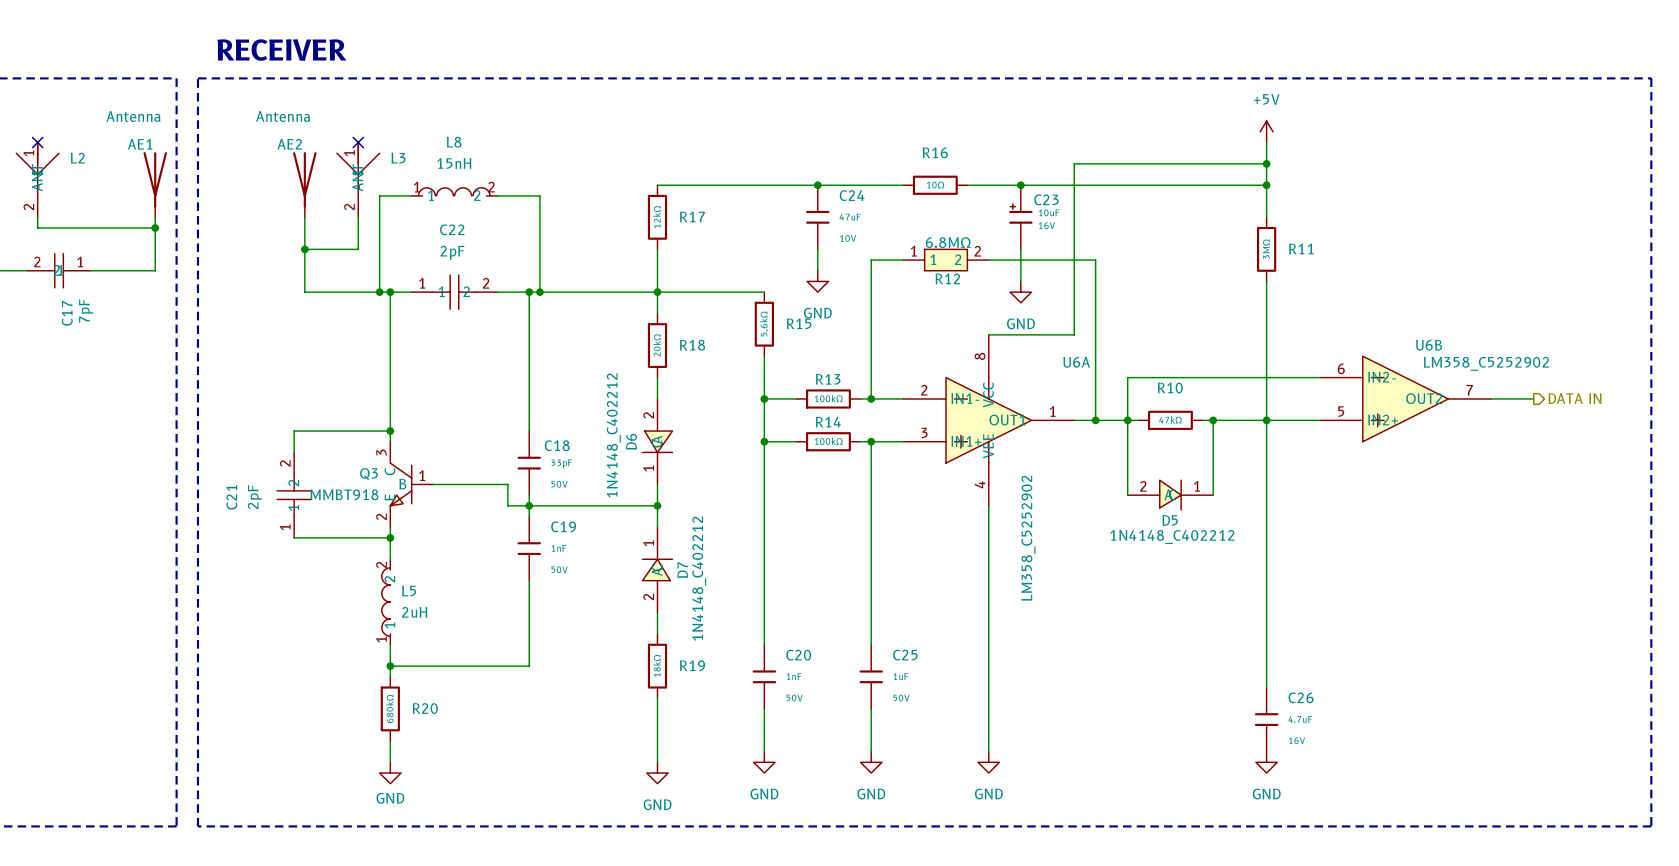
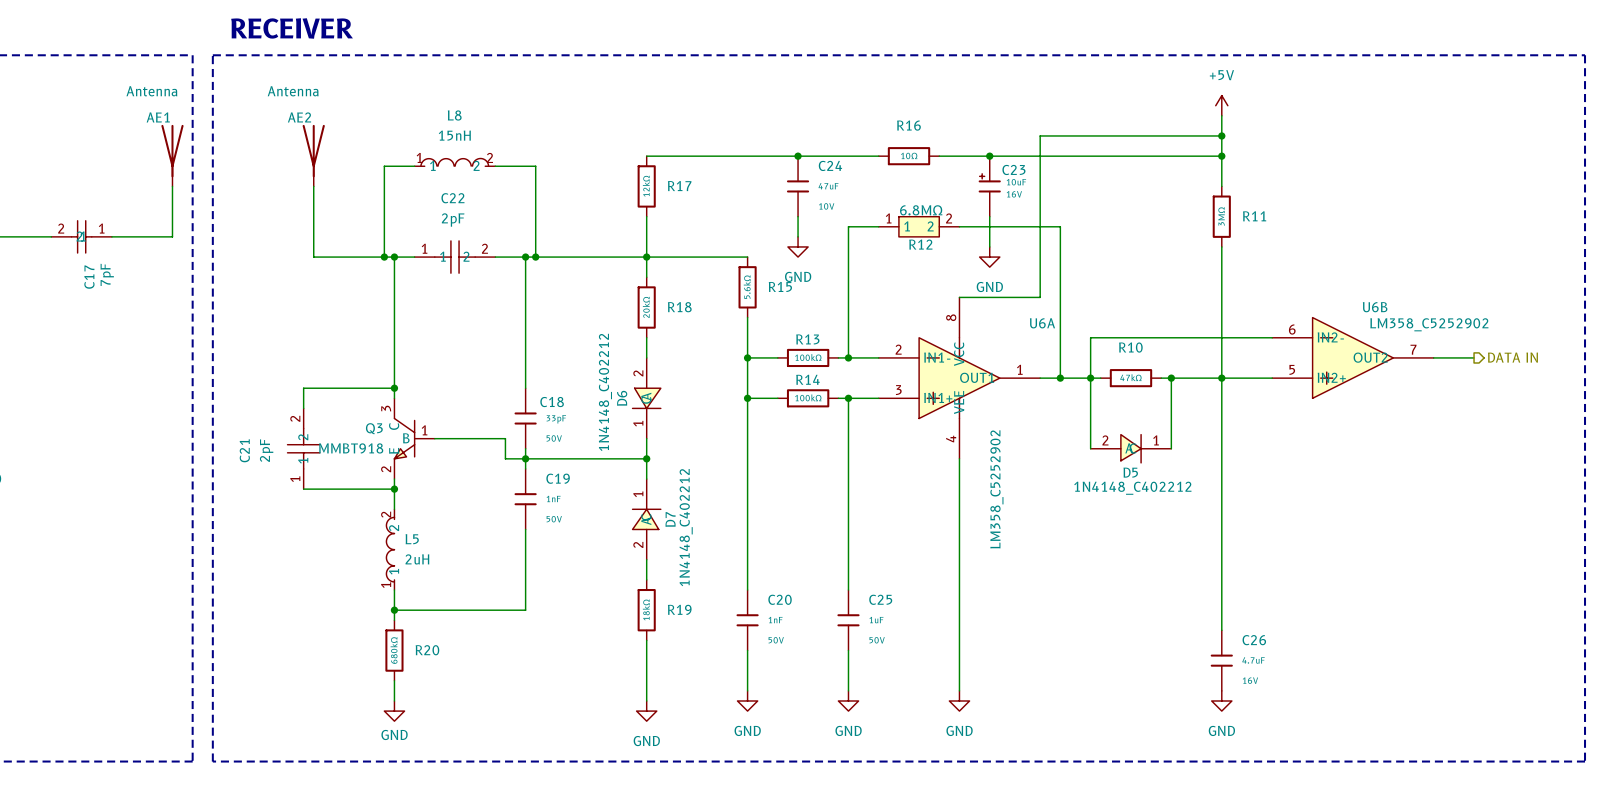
no-connect mark: (37, 142) -> none
no-connect mark: (358, 142) -> none
L2: (37, 179) -> none
L3: (358, 179) -> none
wire: (37, 217) (37, 228) (155, 228) -> none
wire: (358, 217) (358, 249) (304, 249) -> none
junction: (155, 228) -> none
junction: (304, 249) -> none

